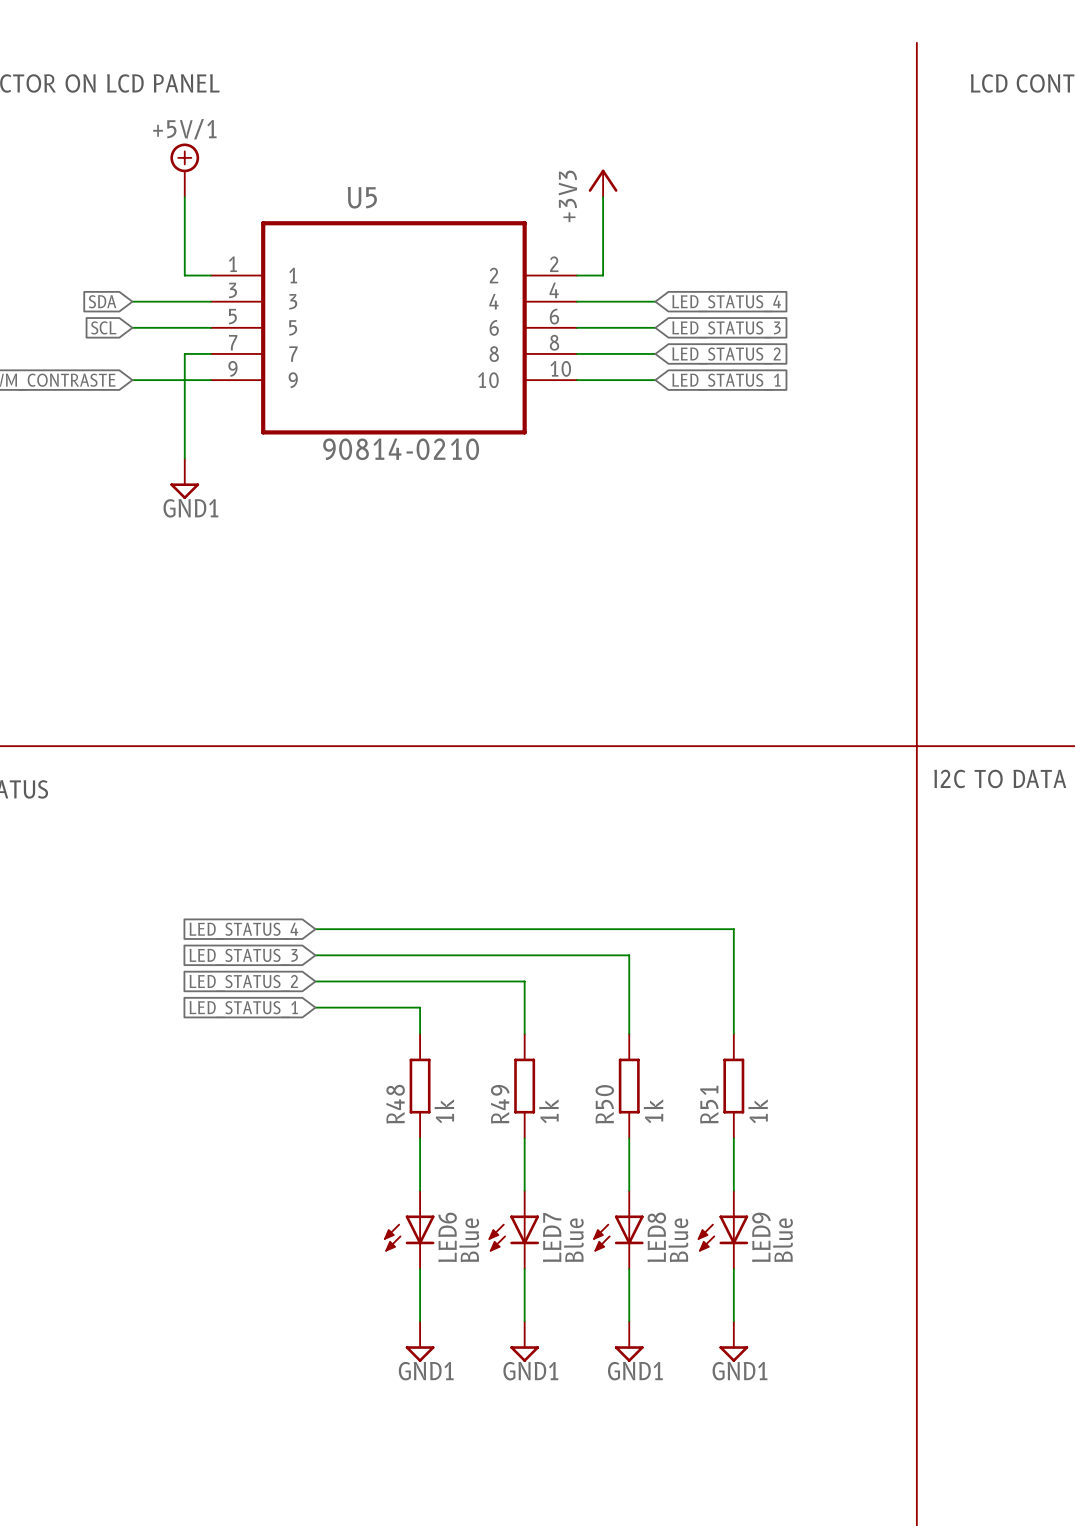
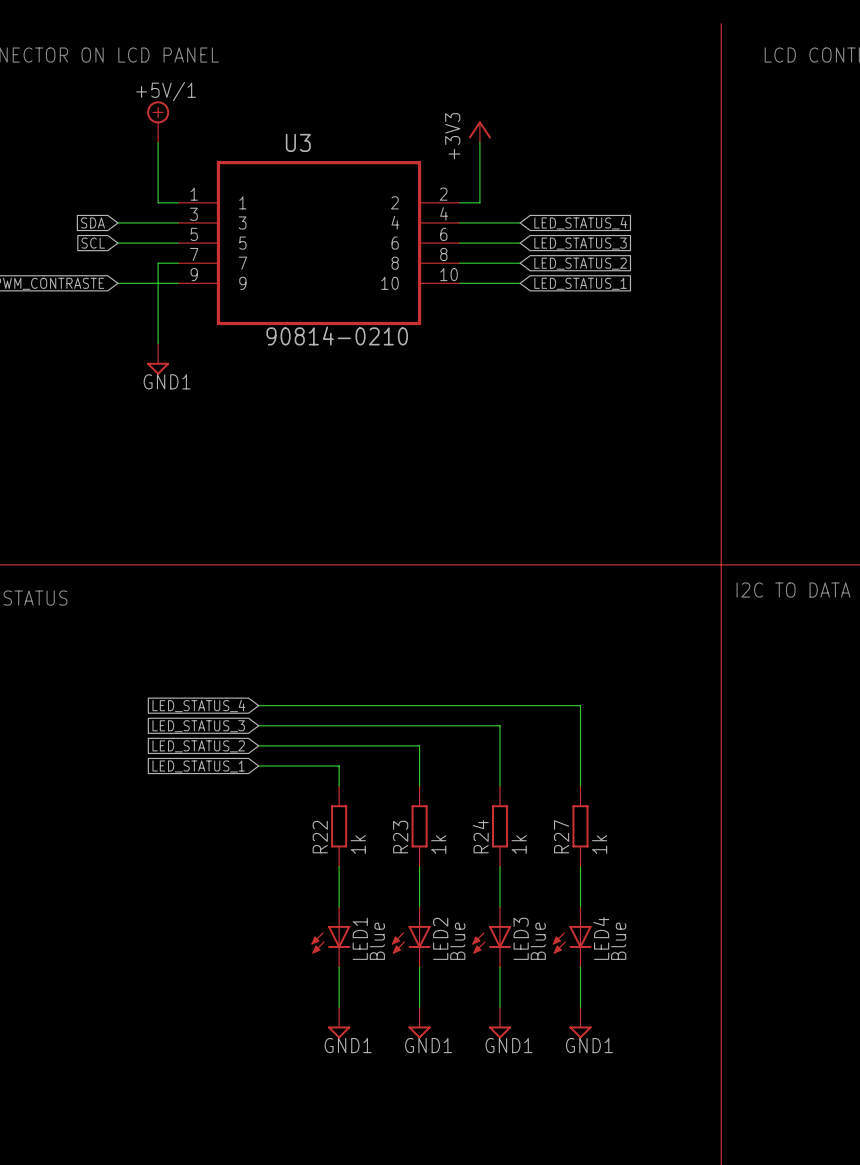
U5 name: U5 (362, 197) -> U3 (298, 142)
R48 name: R48 (395, 1104) -> R22 (320, 837)
R49 name: R49 (500, 1104) -> R23 (400, 837)
R50 name: R50 (604, 1104) -> R24 (480, 836)
R51 name: R51 (709, 1104) -> R27 (561, 836)
LED6 name: LED6 (447, 1237) -> LED1 (360, 938)
LED7 name: LED7 (552, 1237) -> LED2 (440, 938)
LED8 name: LED8 (656, 1237) -> LED3 (521, 938)
LED9 name: LED9 (761, 1237) -> LED4 (601, 938)

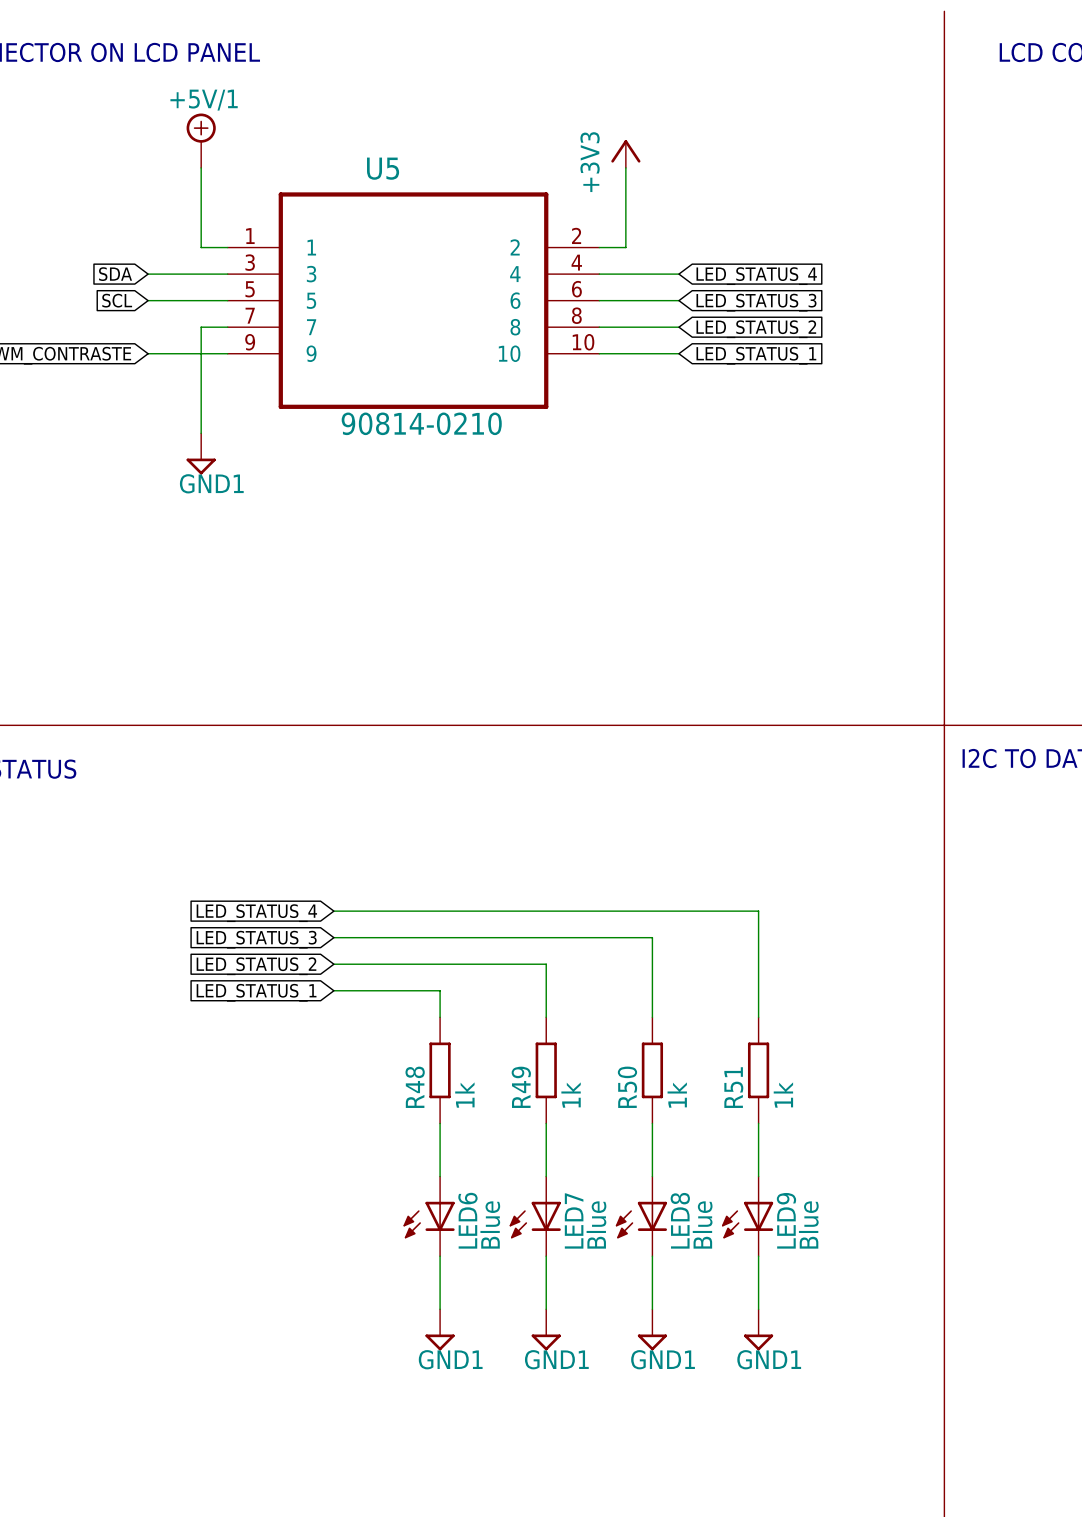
U3 name: U3 (298, 142) -> U5 (383, 168)
R24 name: R24 (480, 836) -> R50 (627, 1087)
R27 name: R27 (561, 836) -> R51 (733, 1087)
R22 name: R22 (320, 837) -> R48 (415, 1087)
R23 name: R23 (400, 837) -> R49 (521, 1087)
LED1 name: LED1 (360, 938) -> LED6 (467, 1220)
LED2 name: LED2 (440, 938) -> LED7 (574, 1220)
LED3 name: LED3 (521, 938) -> LED8 (680, 1220)
LED4 name: LED4 (601, 938) -> LED9 (786, 1220)

